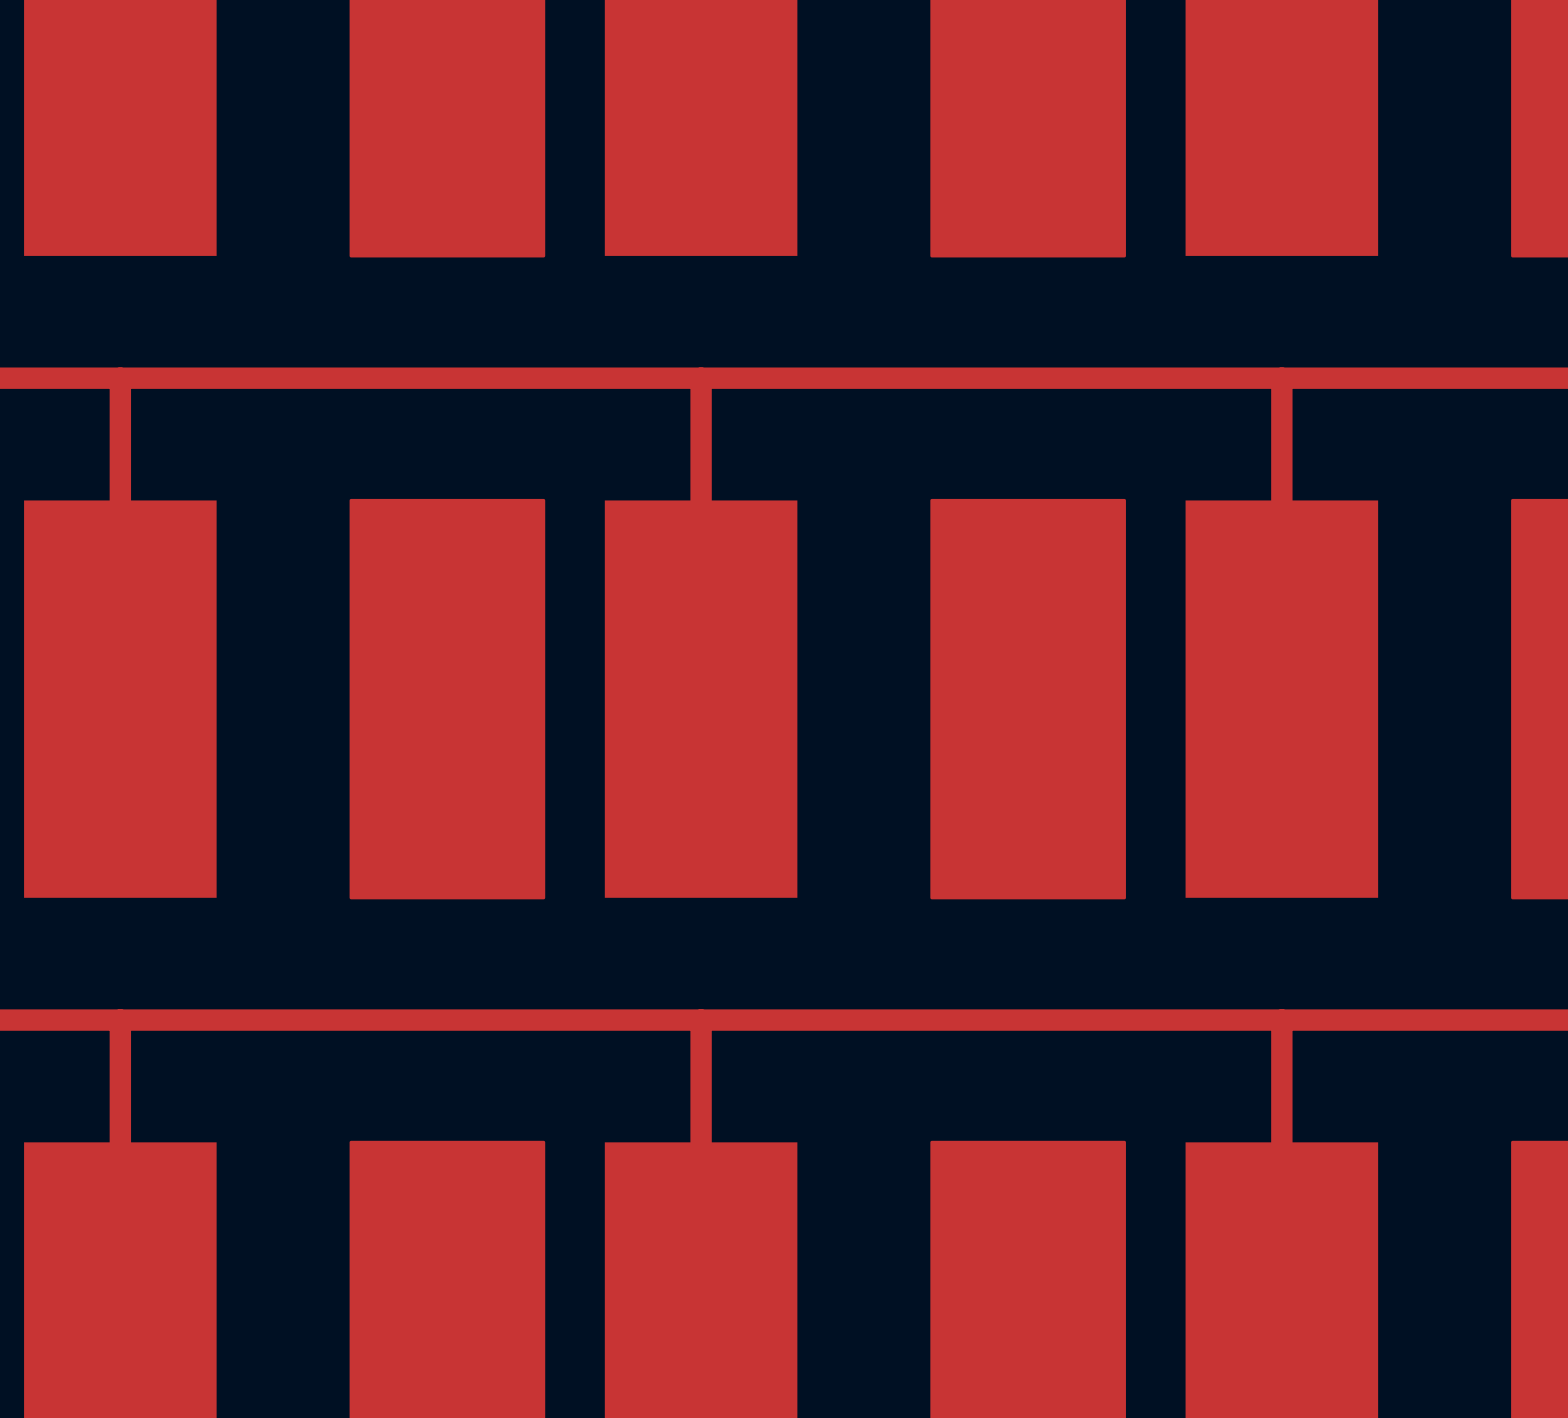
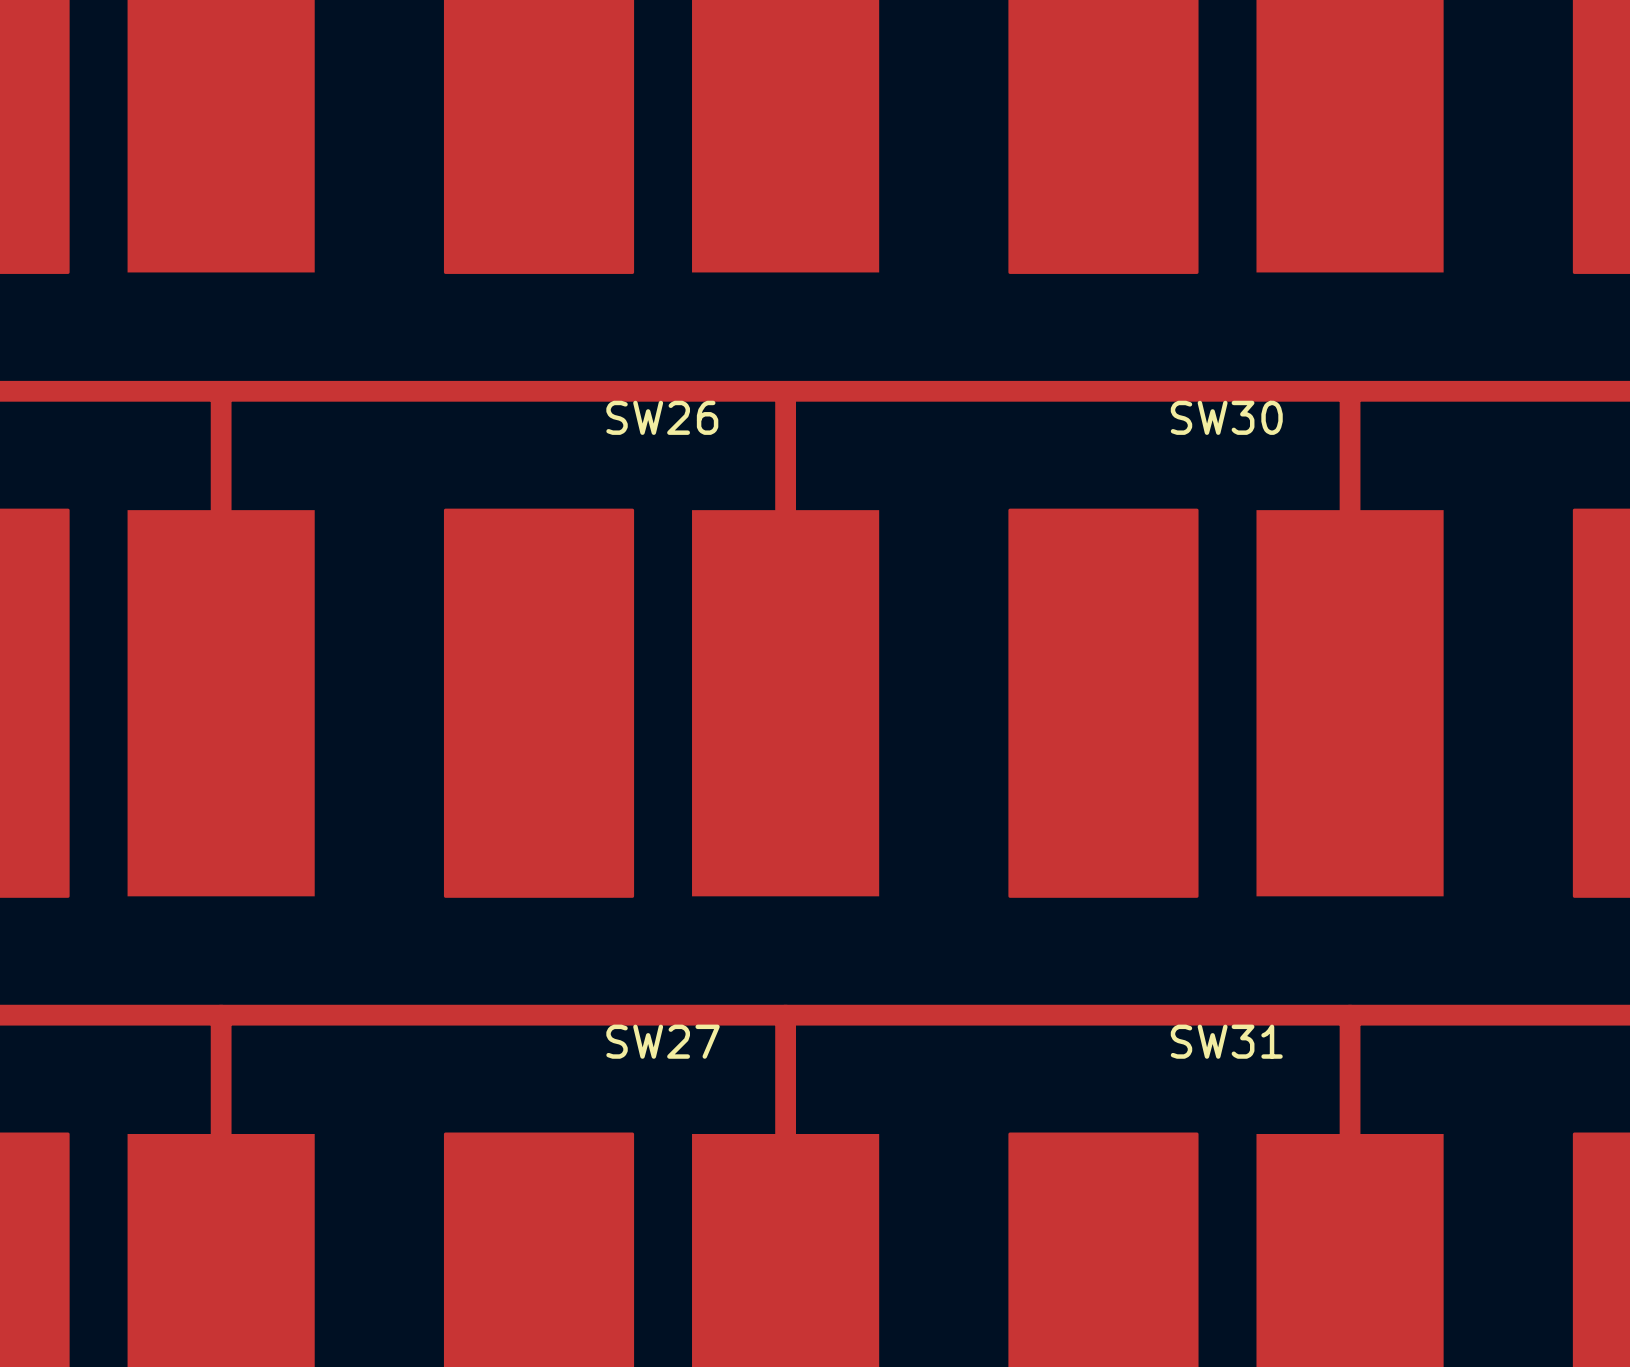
SW26 name: none -> SW26 (662, 417)
SW30 name: none -> SW30 (1226, 417)
SW27 name: none -> SW27 (663, 1041)
SW31 name: none -> SW31 (1226, 1041)

